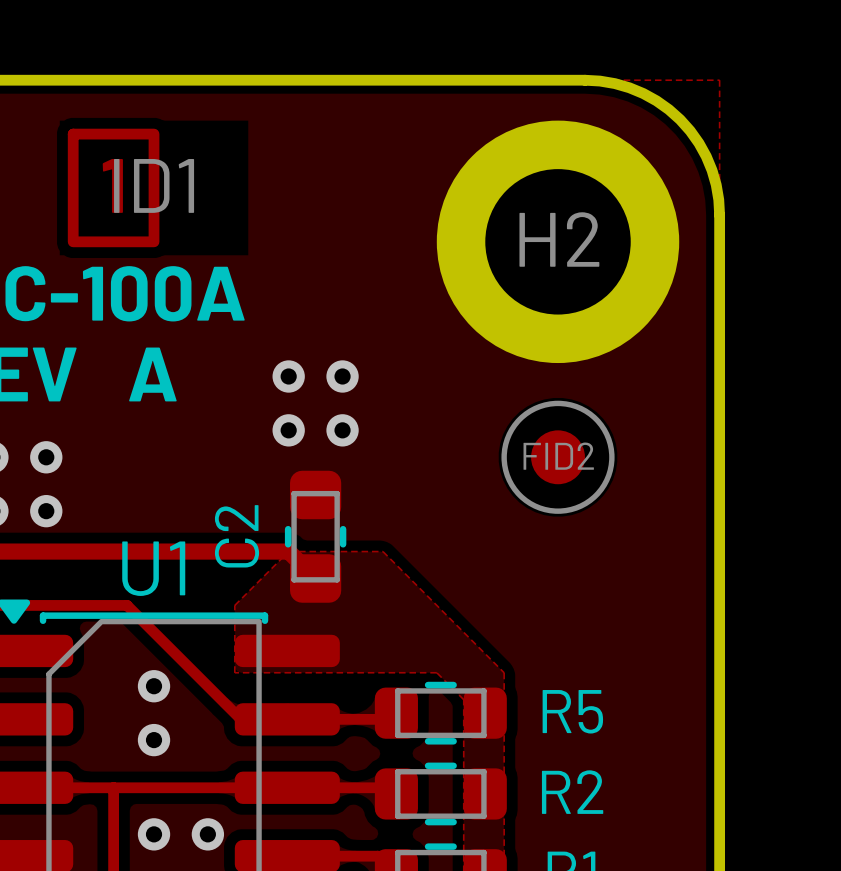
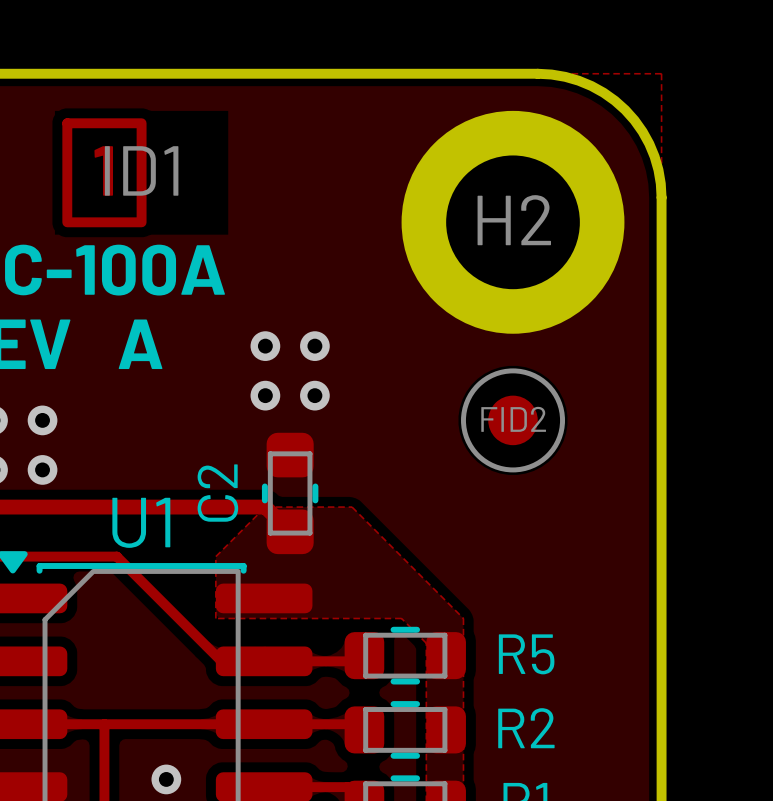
via: (154, 686) -> none
via: (154, 740) -> none
via: (154, 834) -> none
via: (207, 834) -> none
via: none -> (166, 779)

